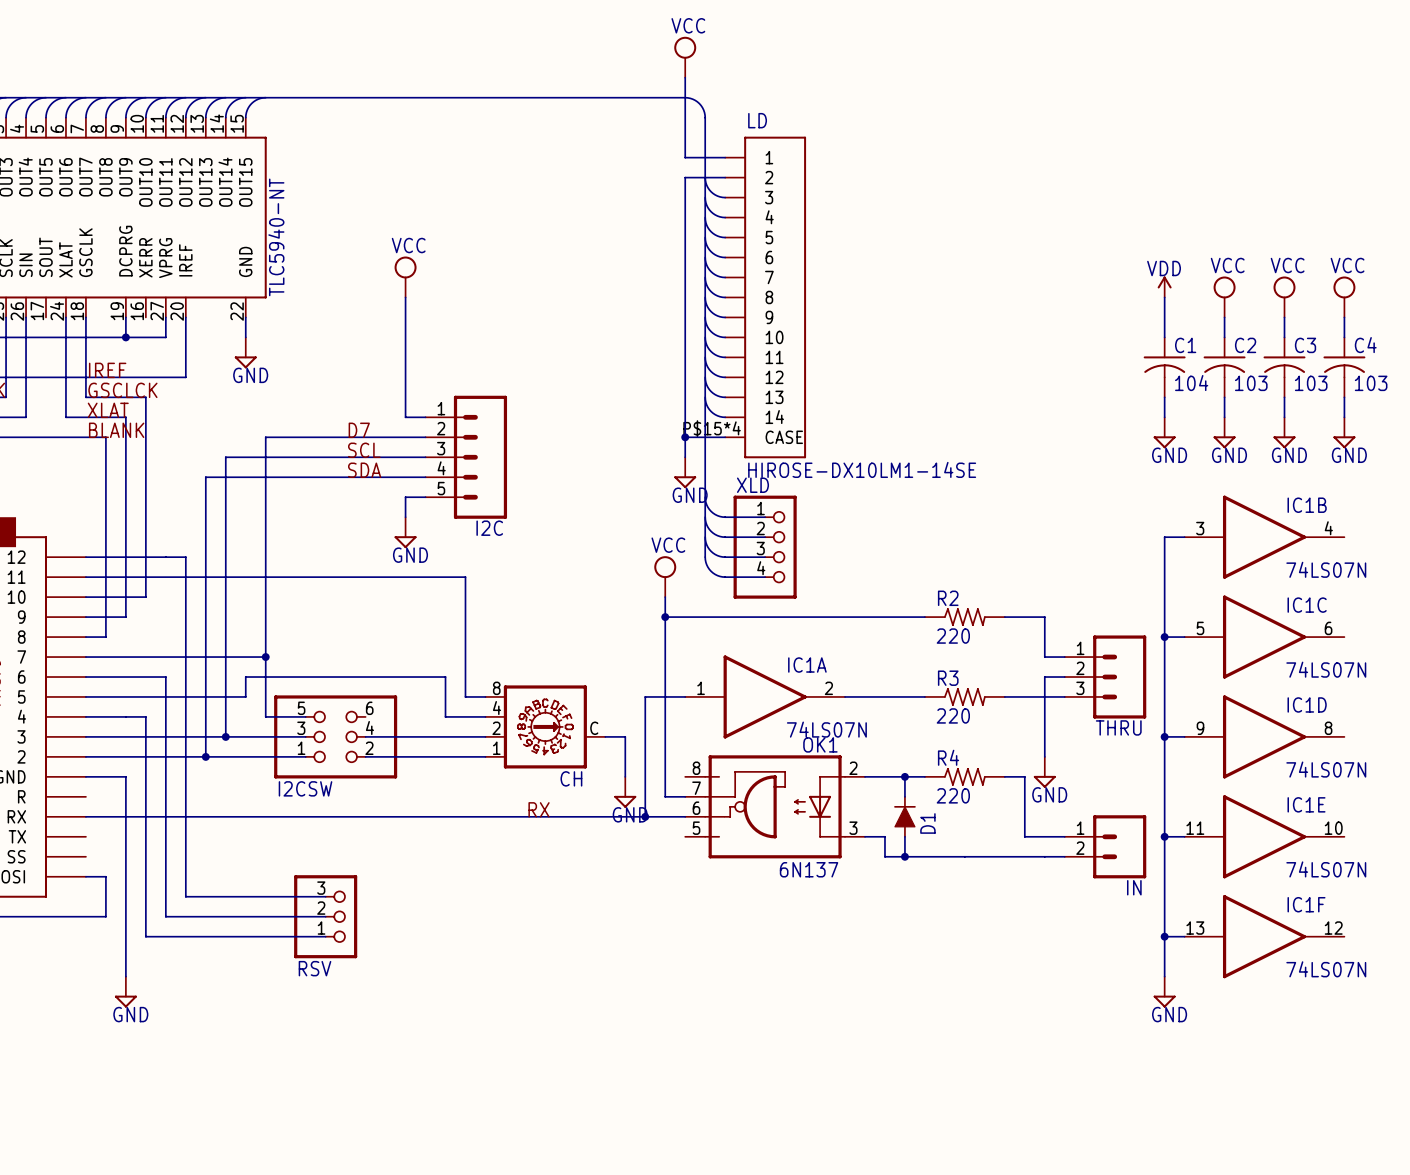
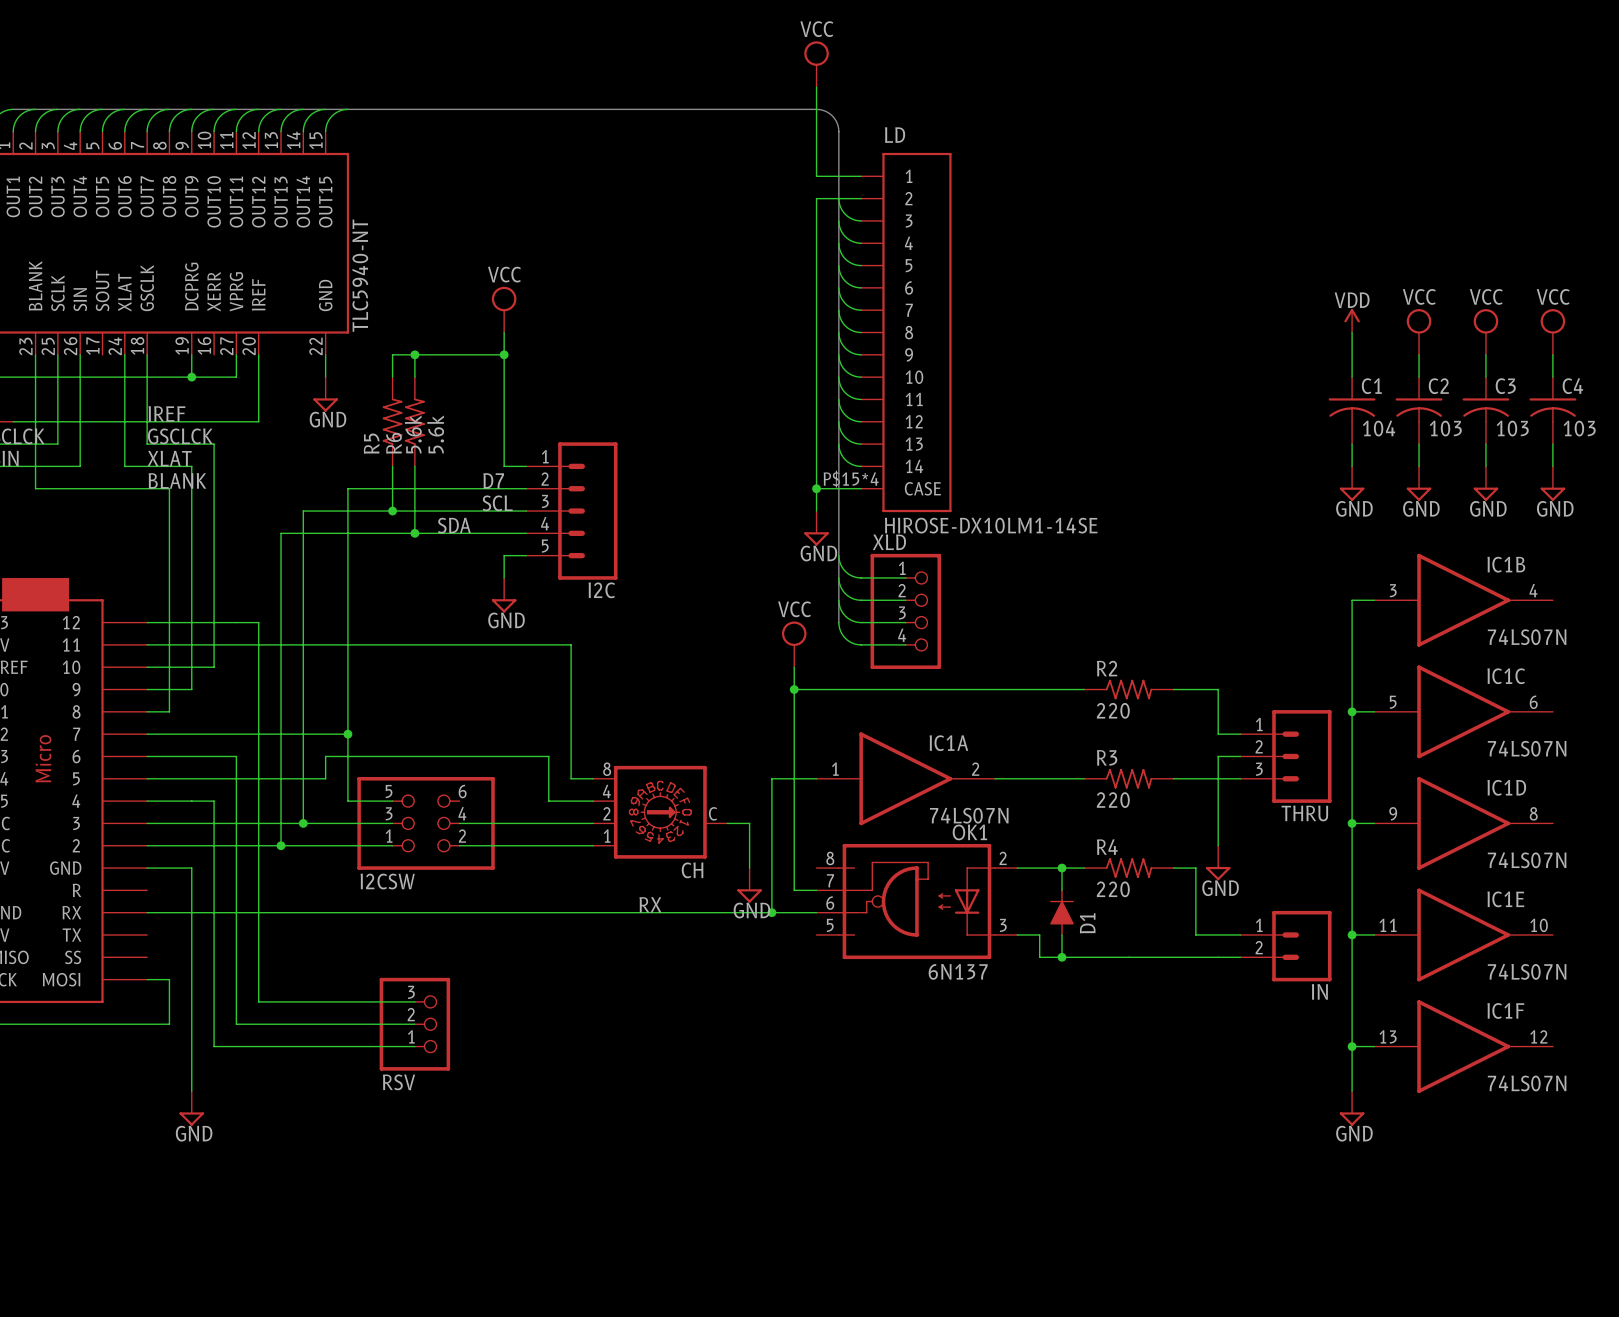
wire: none -> (414, 354) (414, 377)
junction: none -> (414, 354)
wire: none -> (504, 354) (392, 354) (392, 377)
junction: none -> (504, 354)
R5: none -> 5.6k (392, 421)
R6: none -> 5.6k (414, 421)
wire: none -> (392, 466) (392, 511)
wire: none -> (414, 466) (414, 533)
label position: D7 (359, 430) -> D7 (493, 480)
label position: SCL (364, 450) -> SCL (497, 503)
junction: none -> (392, 511)
junction: none -> (414, 533)

